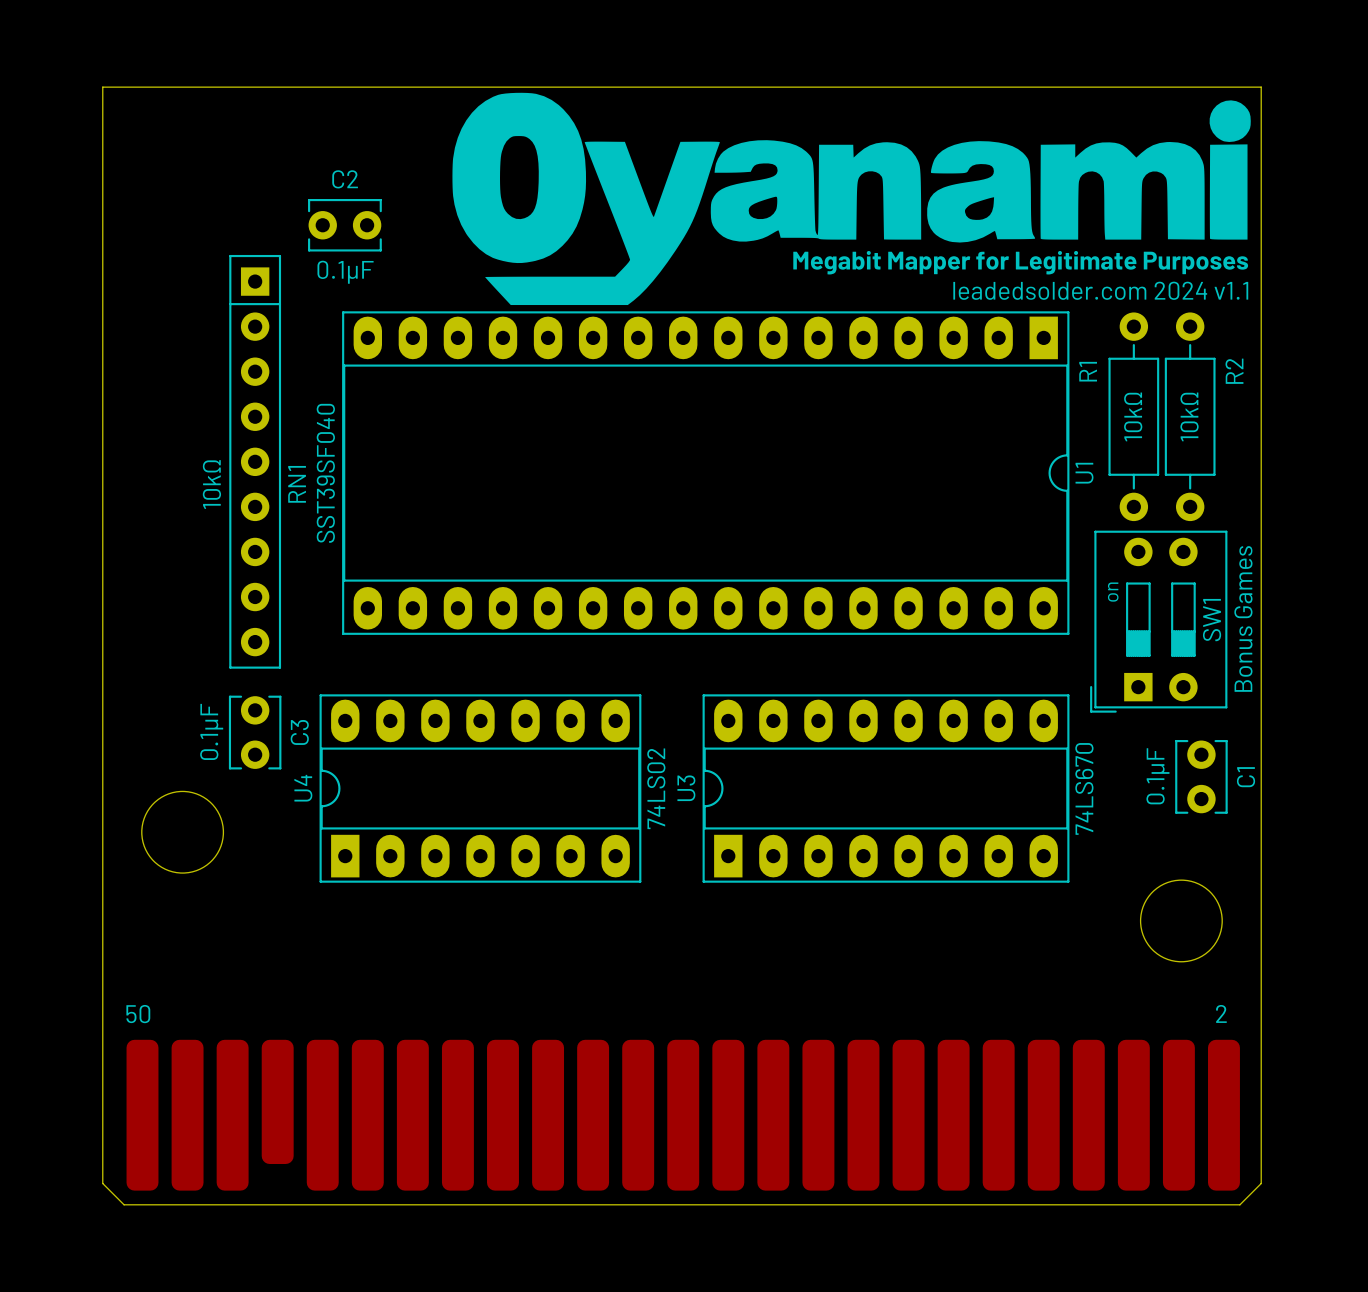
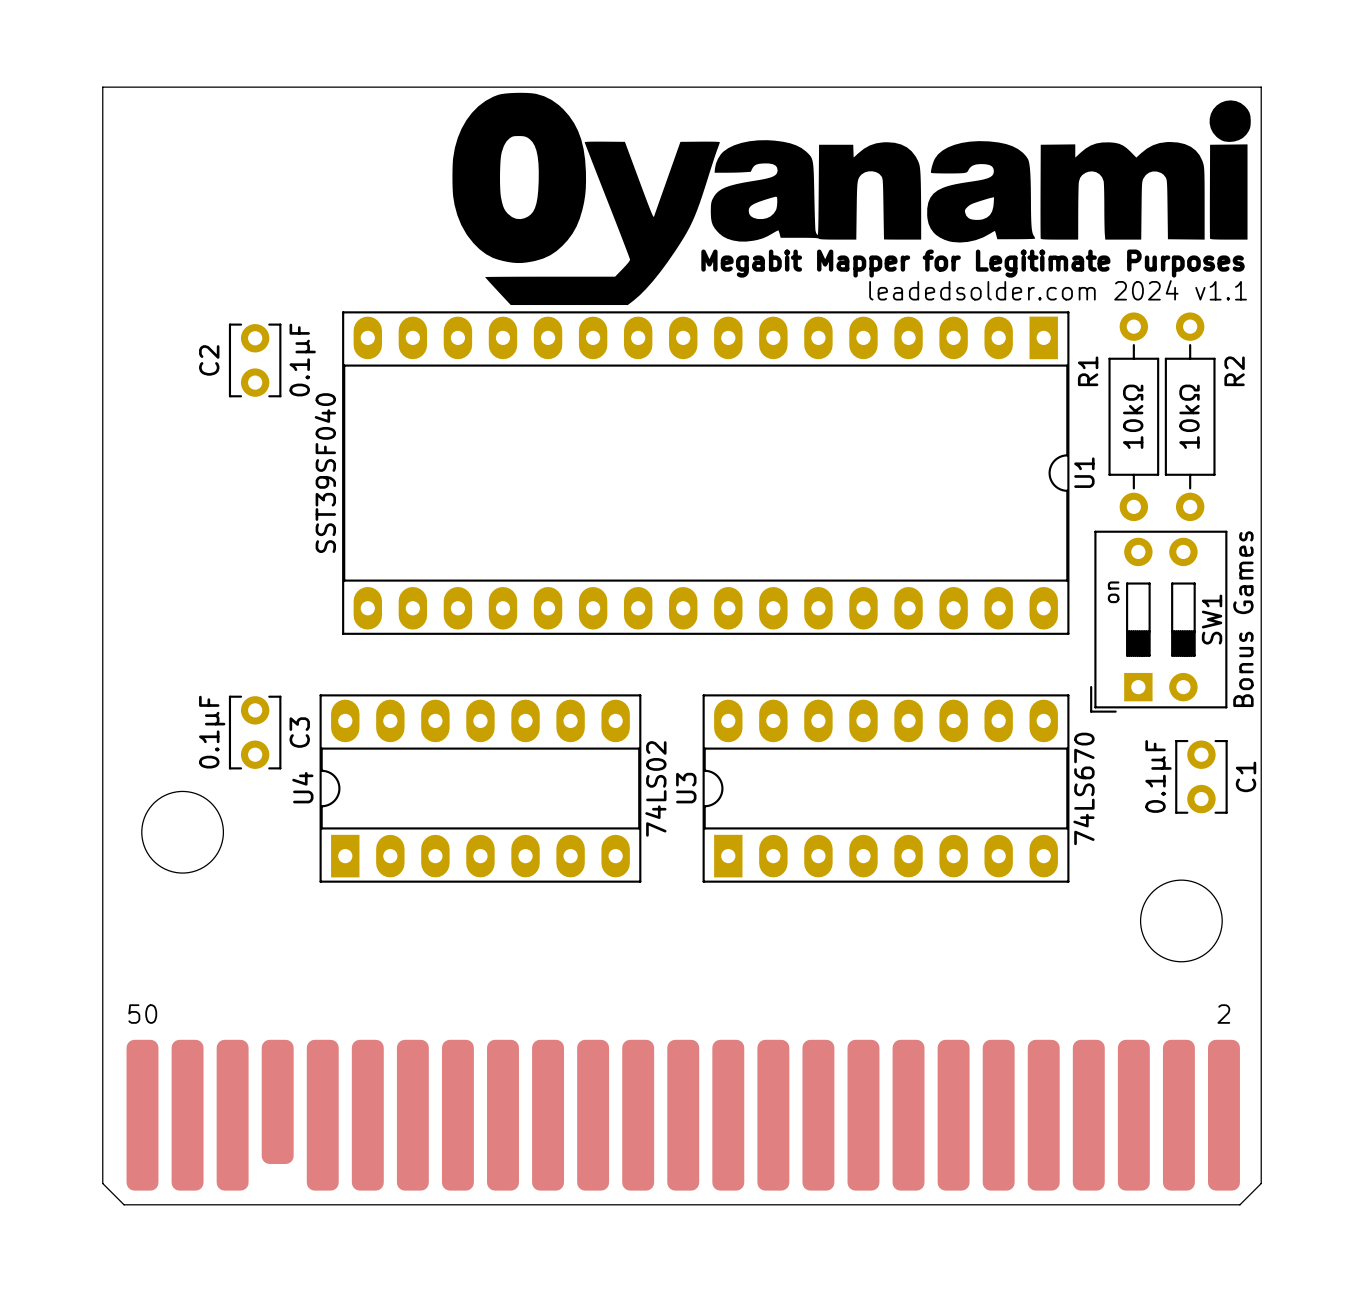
C2 name position: C2 (345, 179) -> C2 (209, 360)
C2 rotation: 0° (344, 225) -> 90° clockwise (255, 360)
C2 position: (344, 225) -> (255, 360)
C2 value position: 0.1µF (345, 272) -> 0.1µF (302, 360)
RN1: 10kΩ (255, 461) -> none

